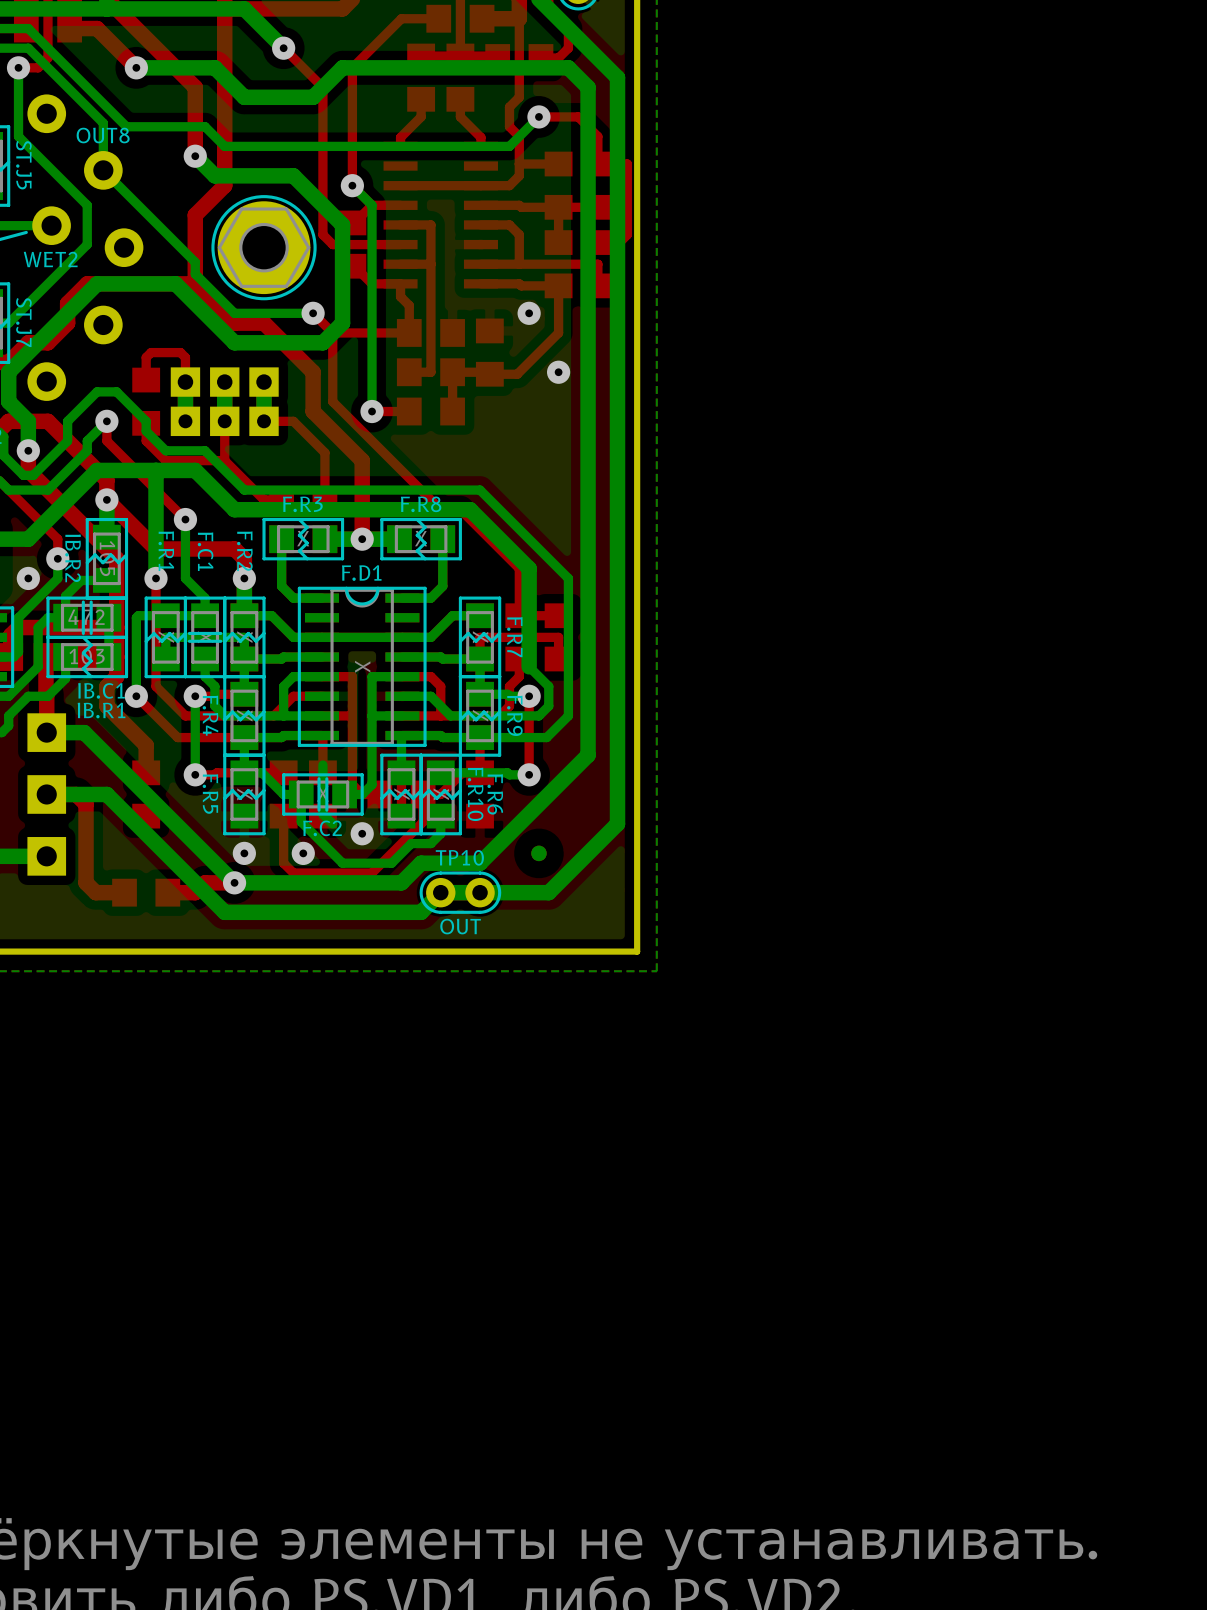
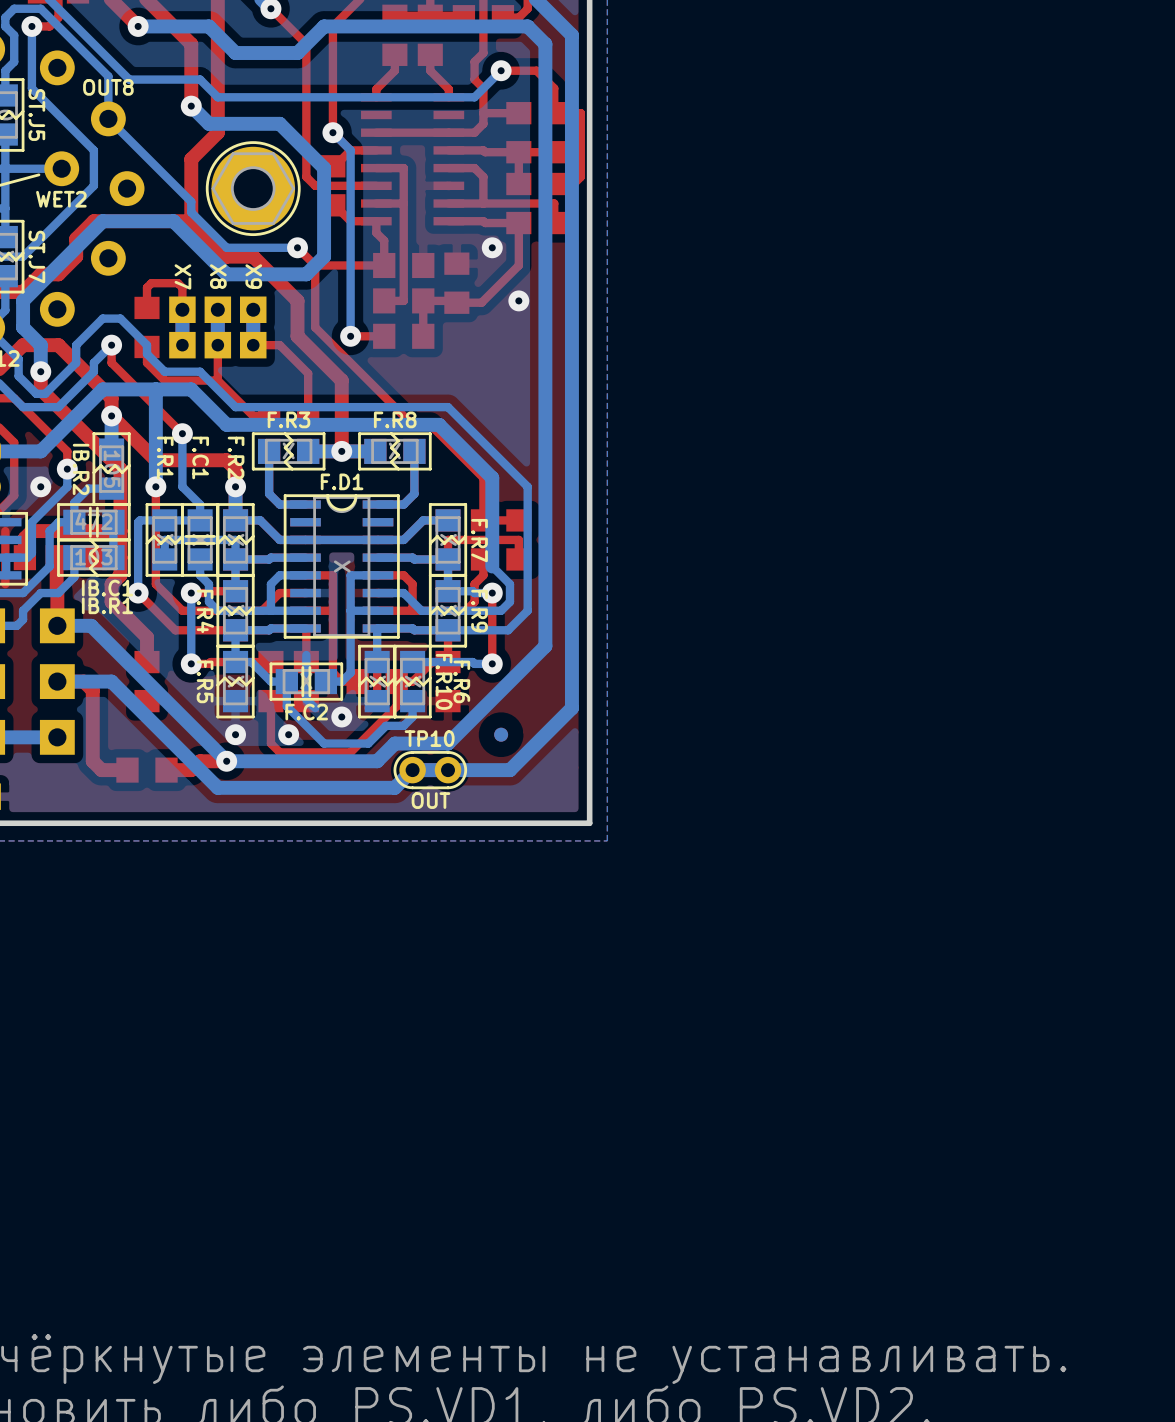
text: none -> X7 (182, 276)
text: none -> X8 (218, 276)
text: none -> X9 (253, 276)

